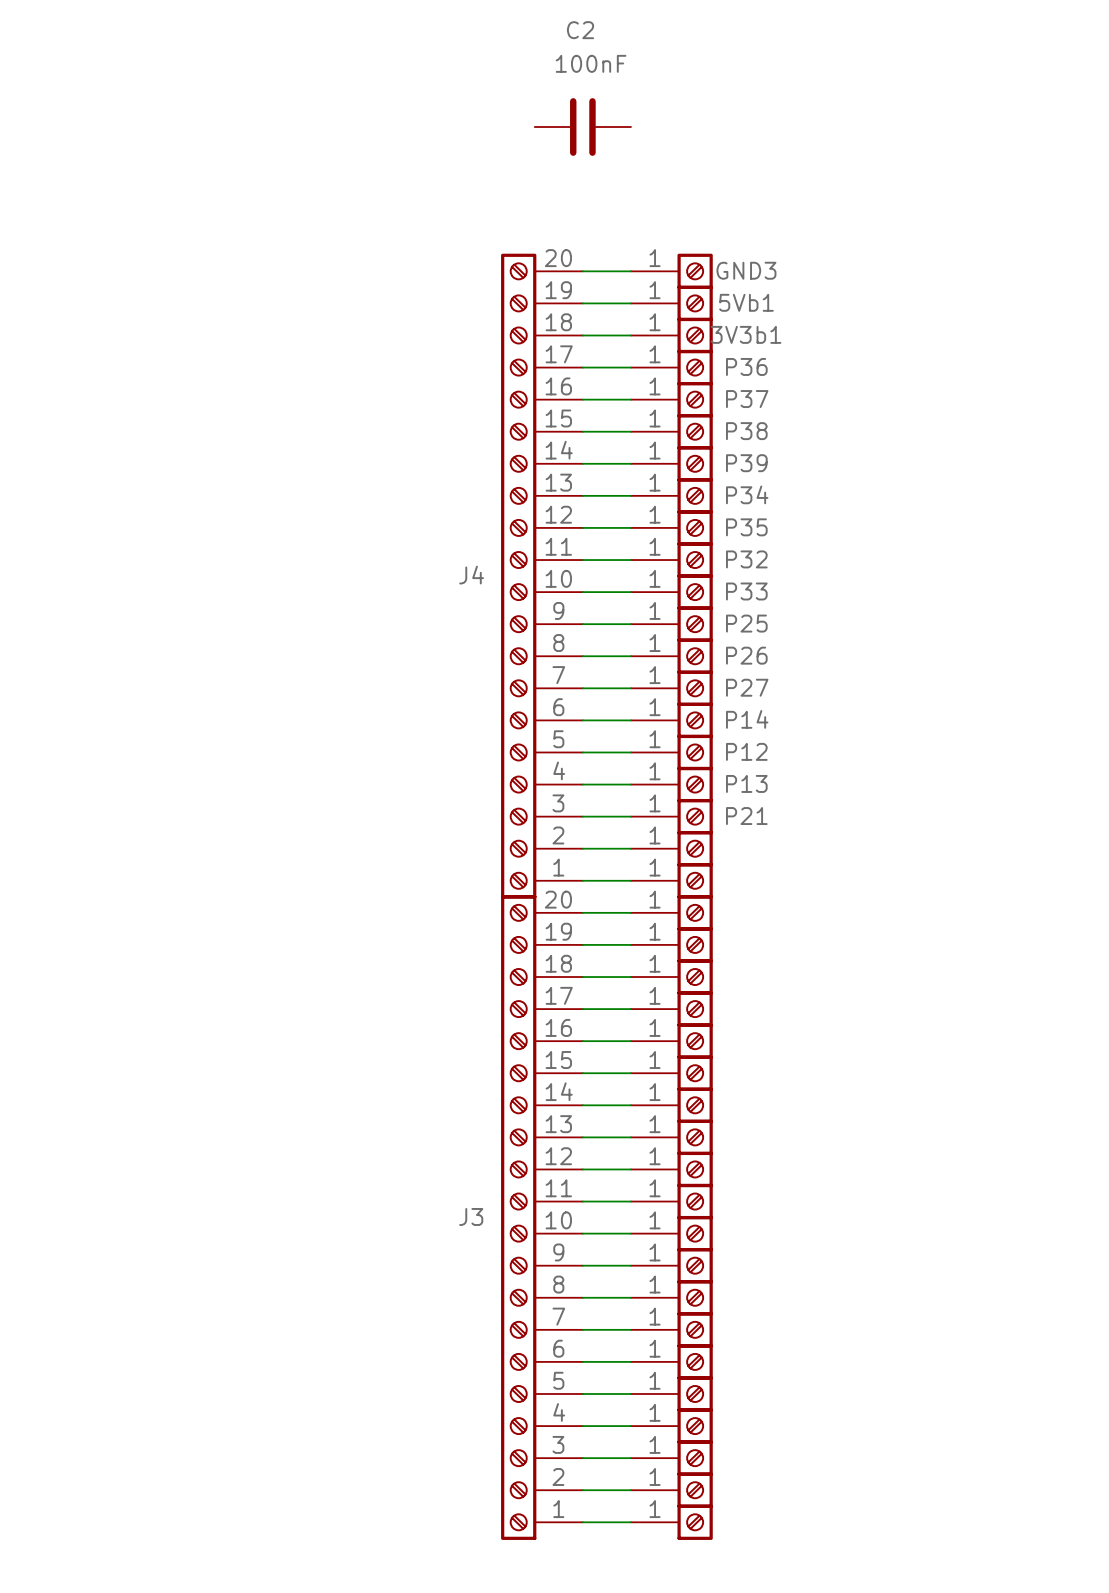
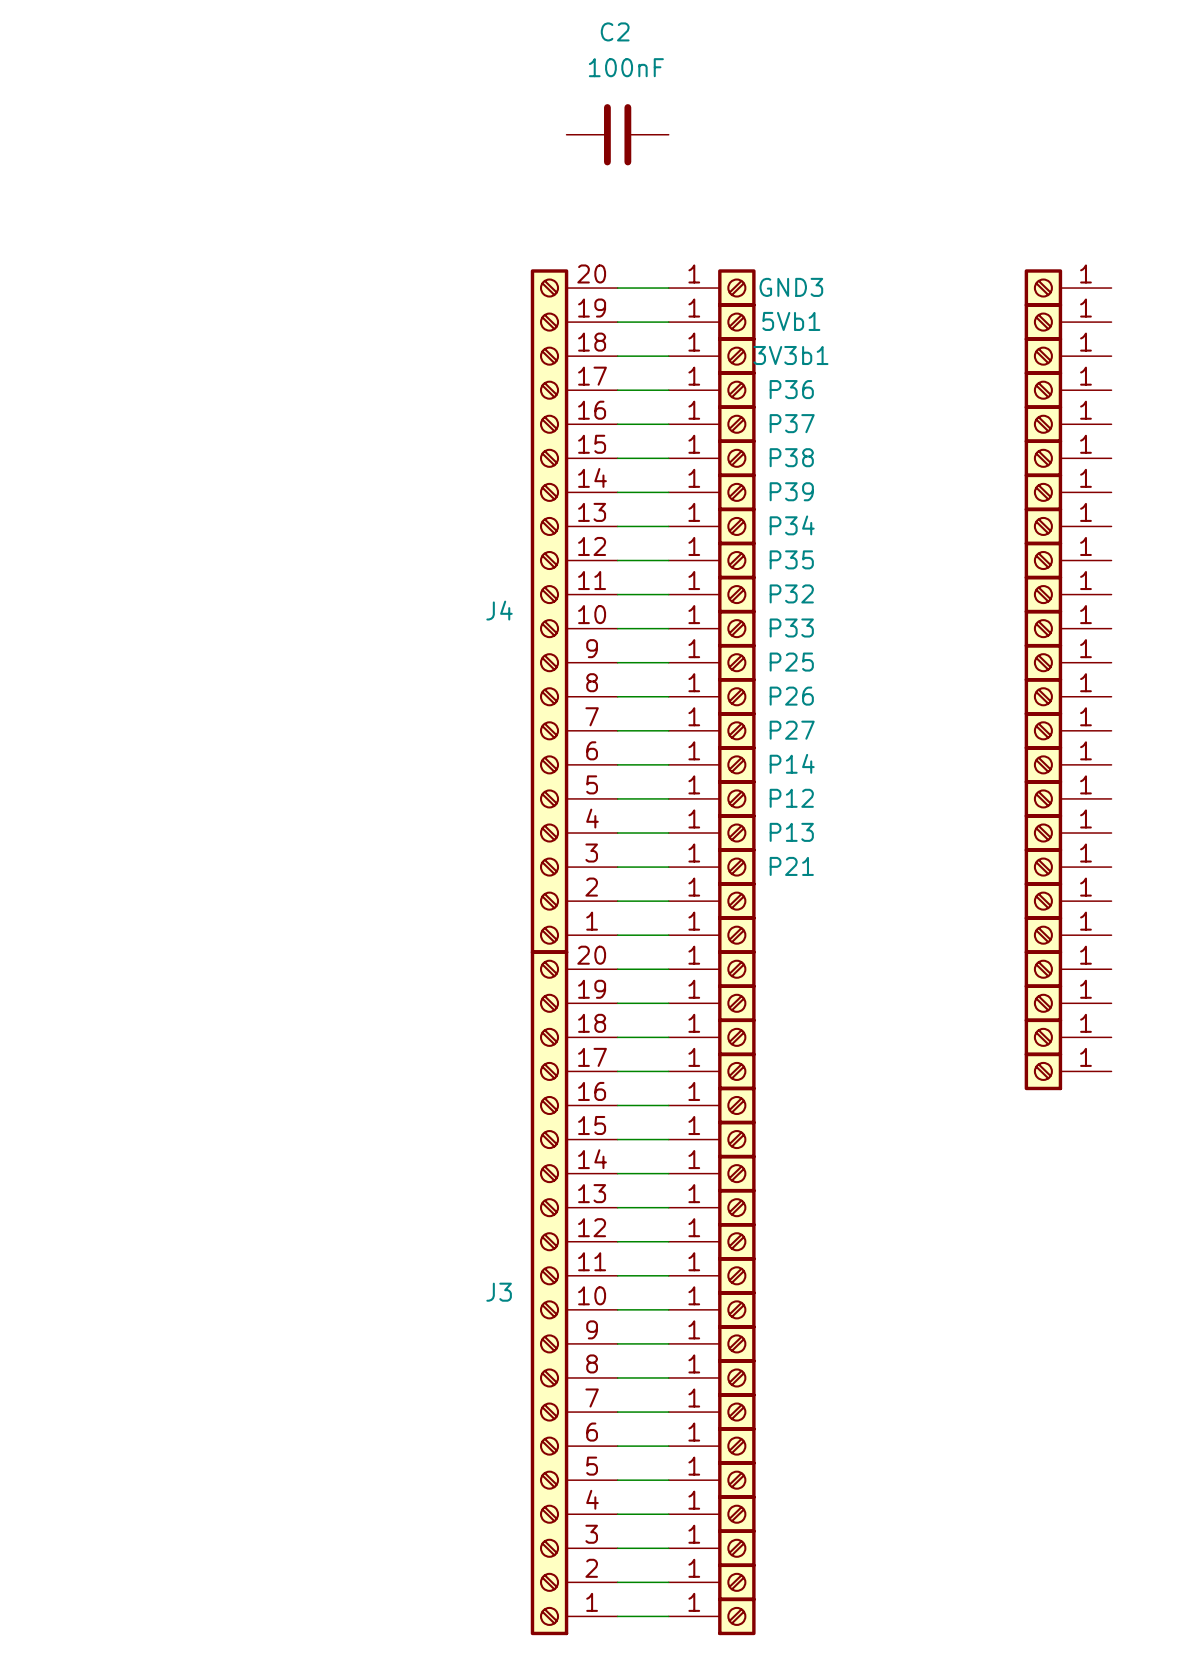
part: none -> (1068, 288)
part: none -> (1068, 322)
part: none -> (1068, 356)
part: none -> (1068, 390)
part: none -> (1068, 424)
part: none -> (1068, 458)
part: none -> (1068, 492)
part: none -> (1068, 526)
part: none -> (1068, 560)
part: none -> (1068, 594)
part: none -> (1068, 628)
part: none -> (1068, 662)
part: none -> (1068, 696)
part: none -> (1068, 730)
part: none -> (1068, 764)
part: none -> (1068, 798)
part: none -> (1068, 833)
part: none -> (1068, 867)
part: none -> (1068, 901)
part: none -> (1068, 935)
part: none -> (1068, 969)
part: none -> (1068, 1003)
part: none -> (1068, 1037)
part: none -> (1068, 1071)

